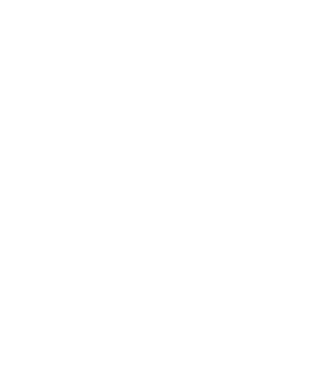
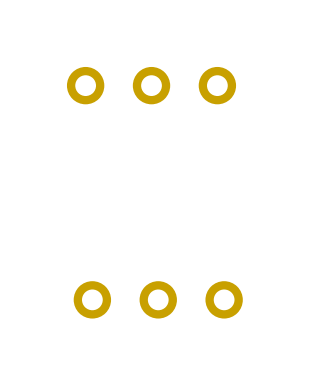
part: none -> (151, 85)
part: none -> (158, 299)

